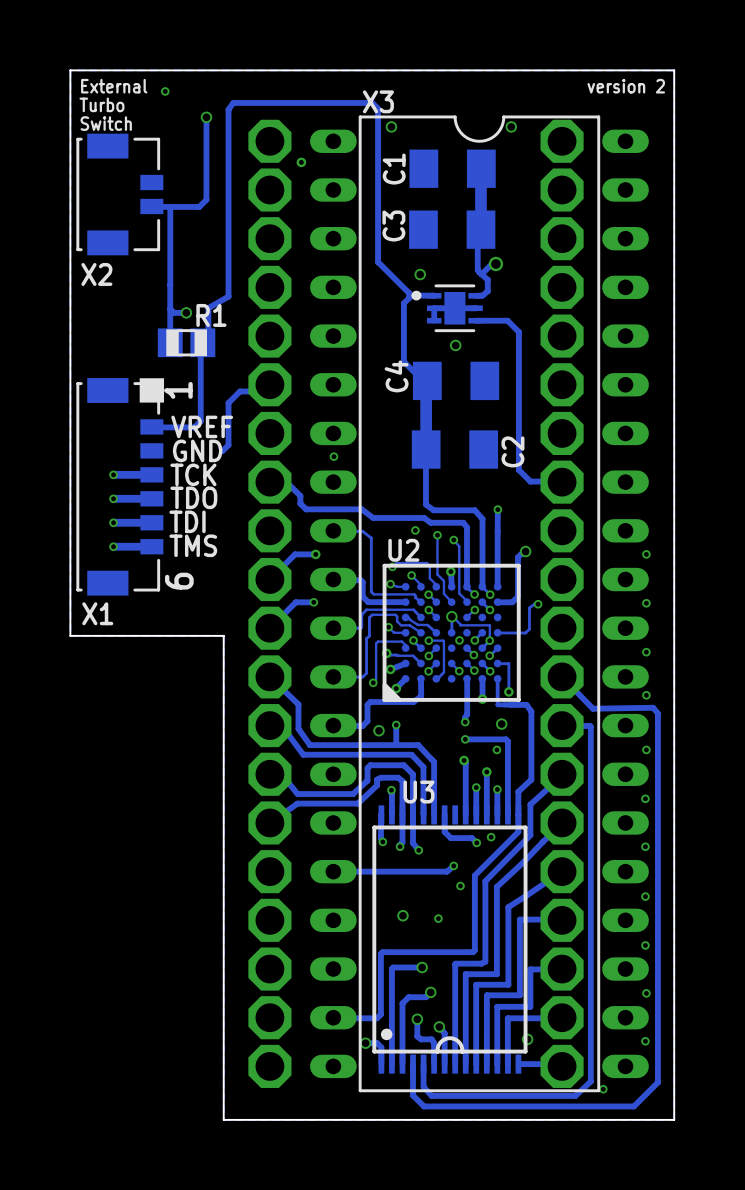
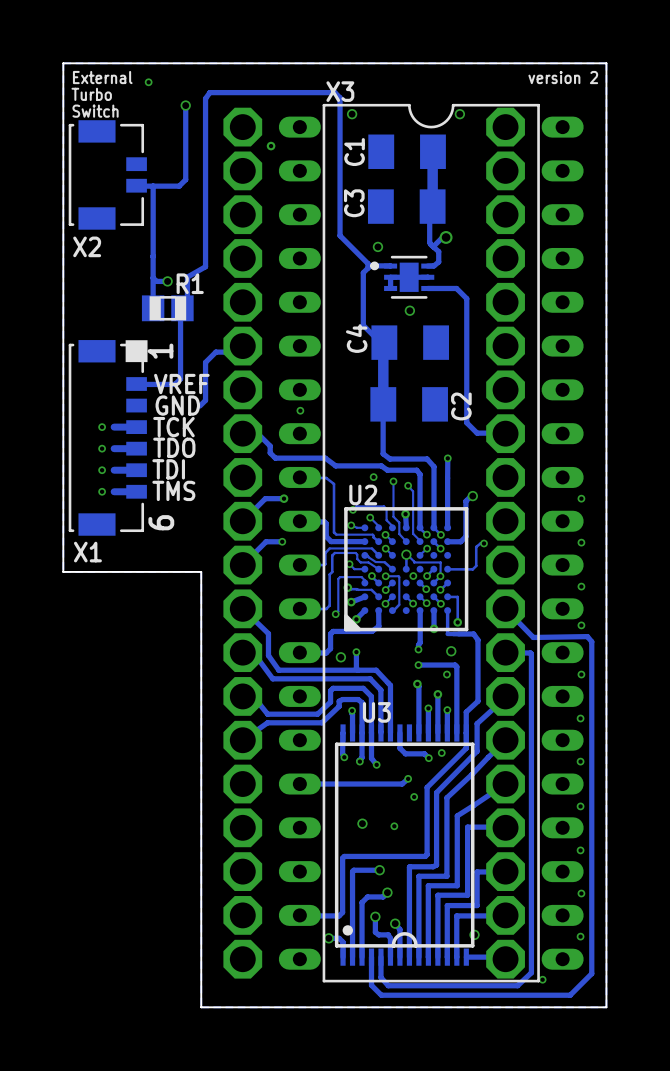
track: (126, 474) (113, 474) -> none
track: (126, 498) (113, 498) -> none
track: (126, 522) (113, 522) -> none
track: (126, 546) (113, 546) -> none

